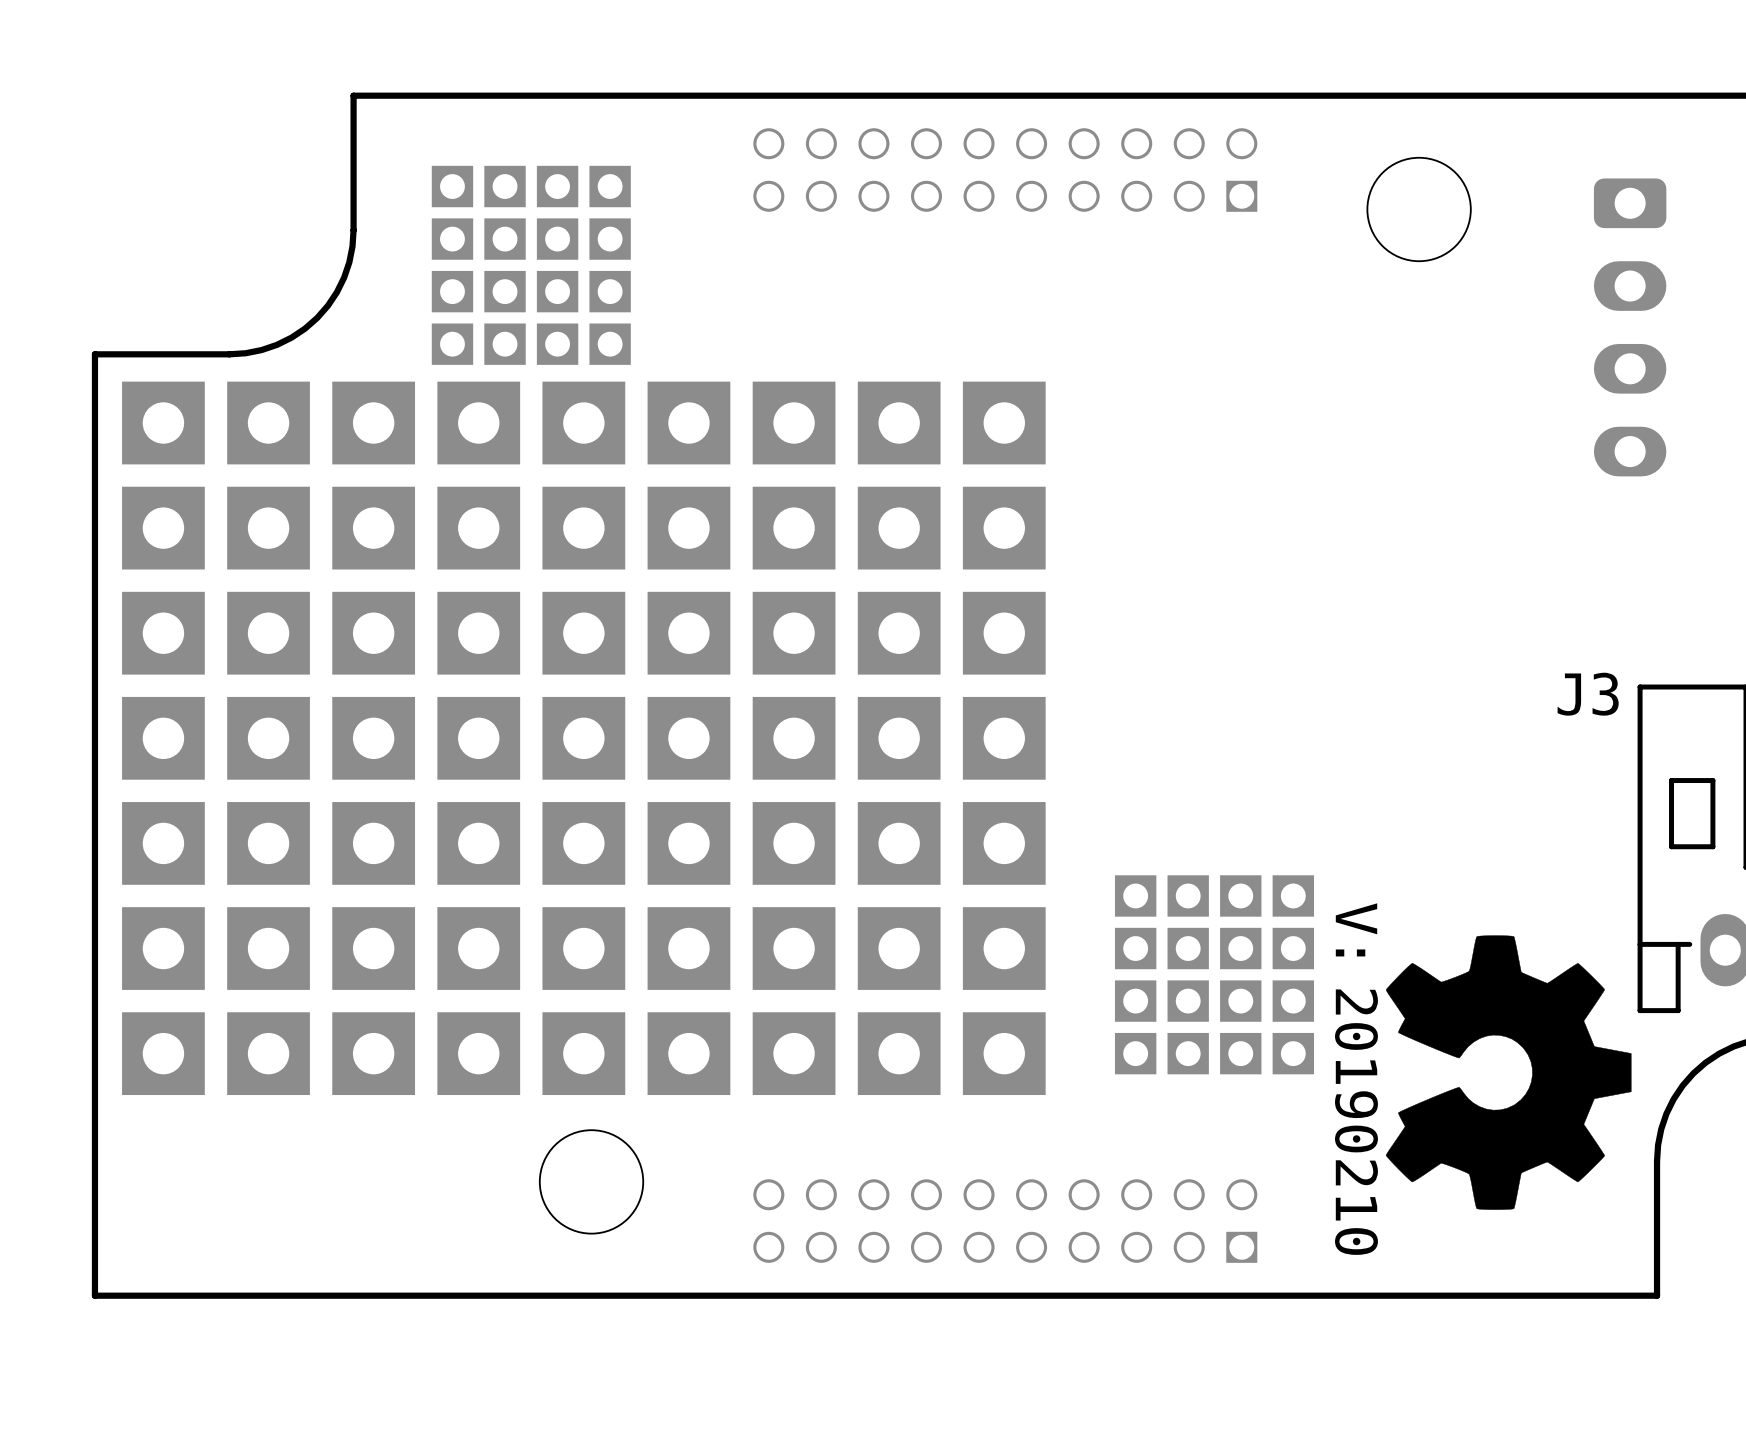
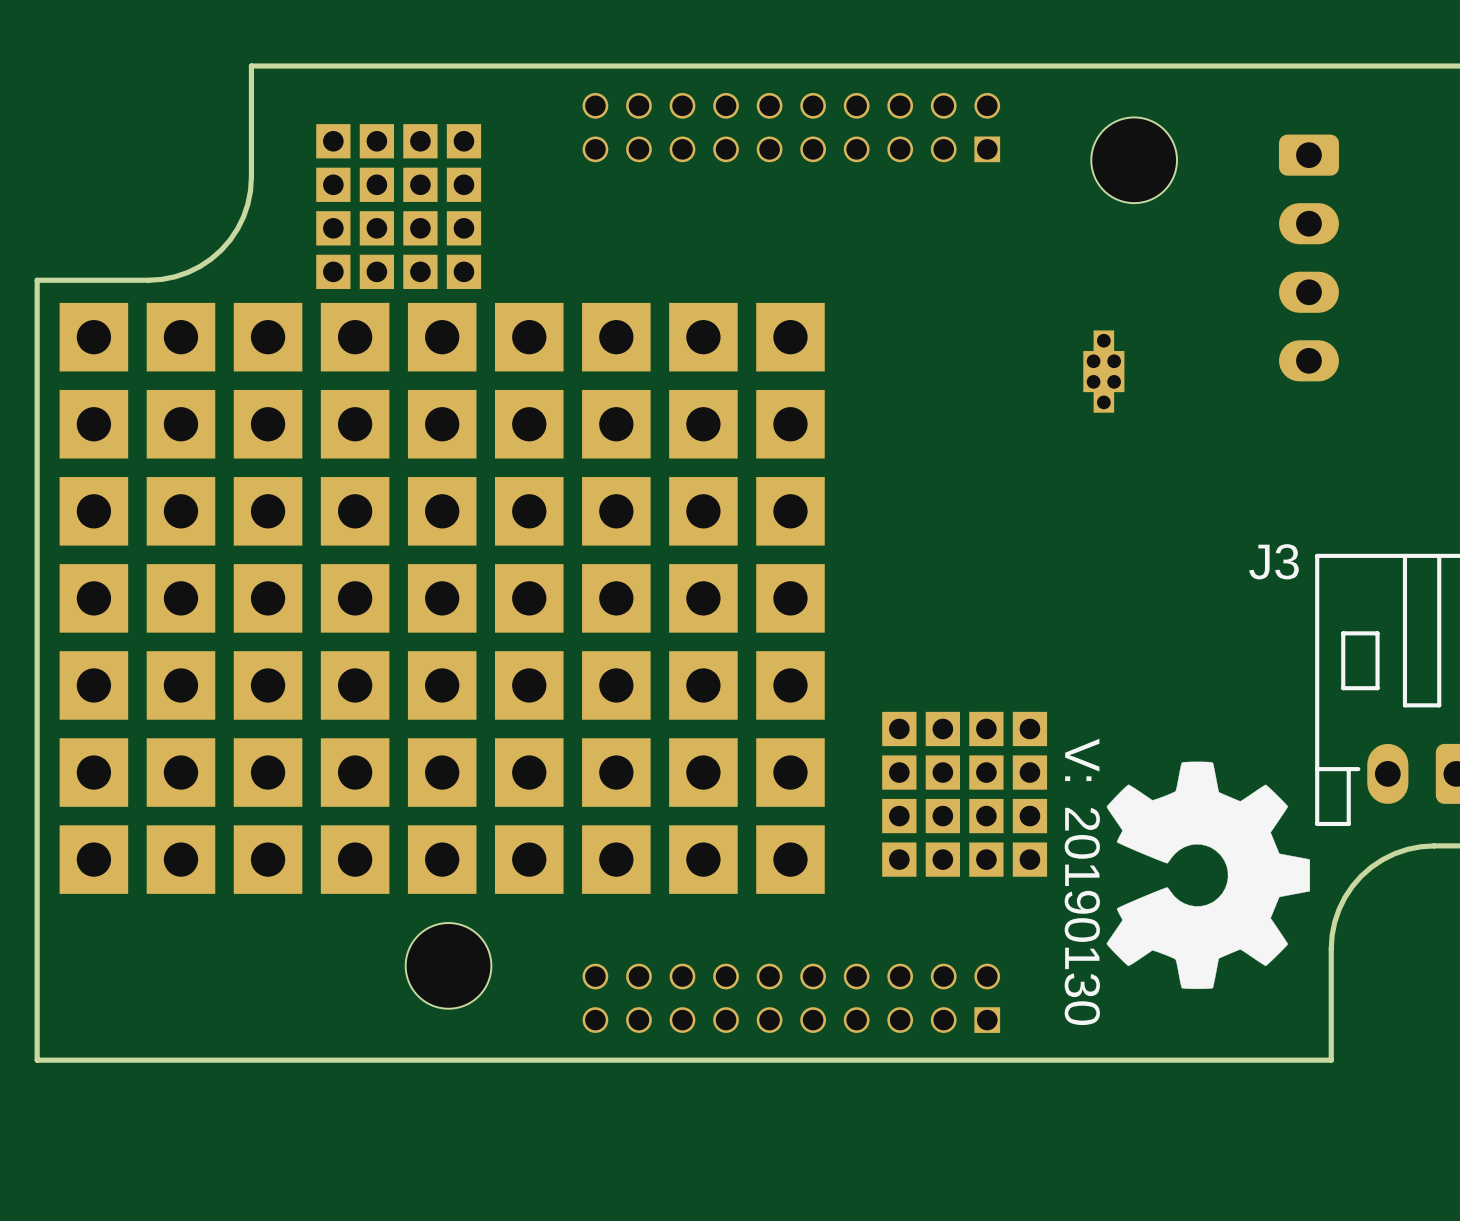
part: none -> (1103, 371)
drawing shape: [1335, 903, 1378, 1255] -> [1064, 738, 1100, 1026]

